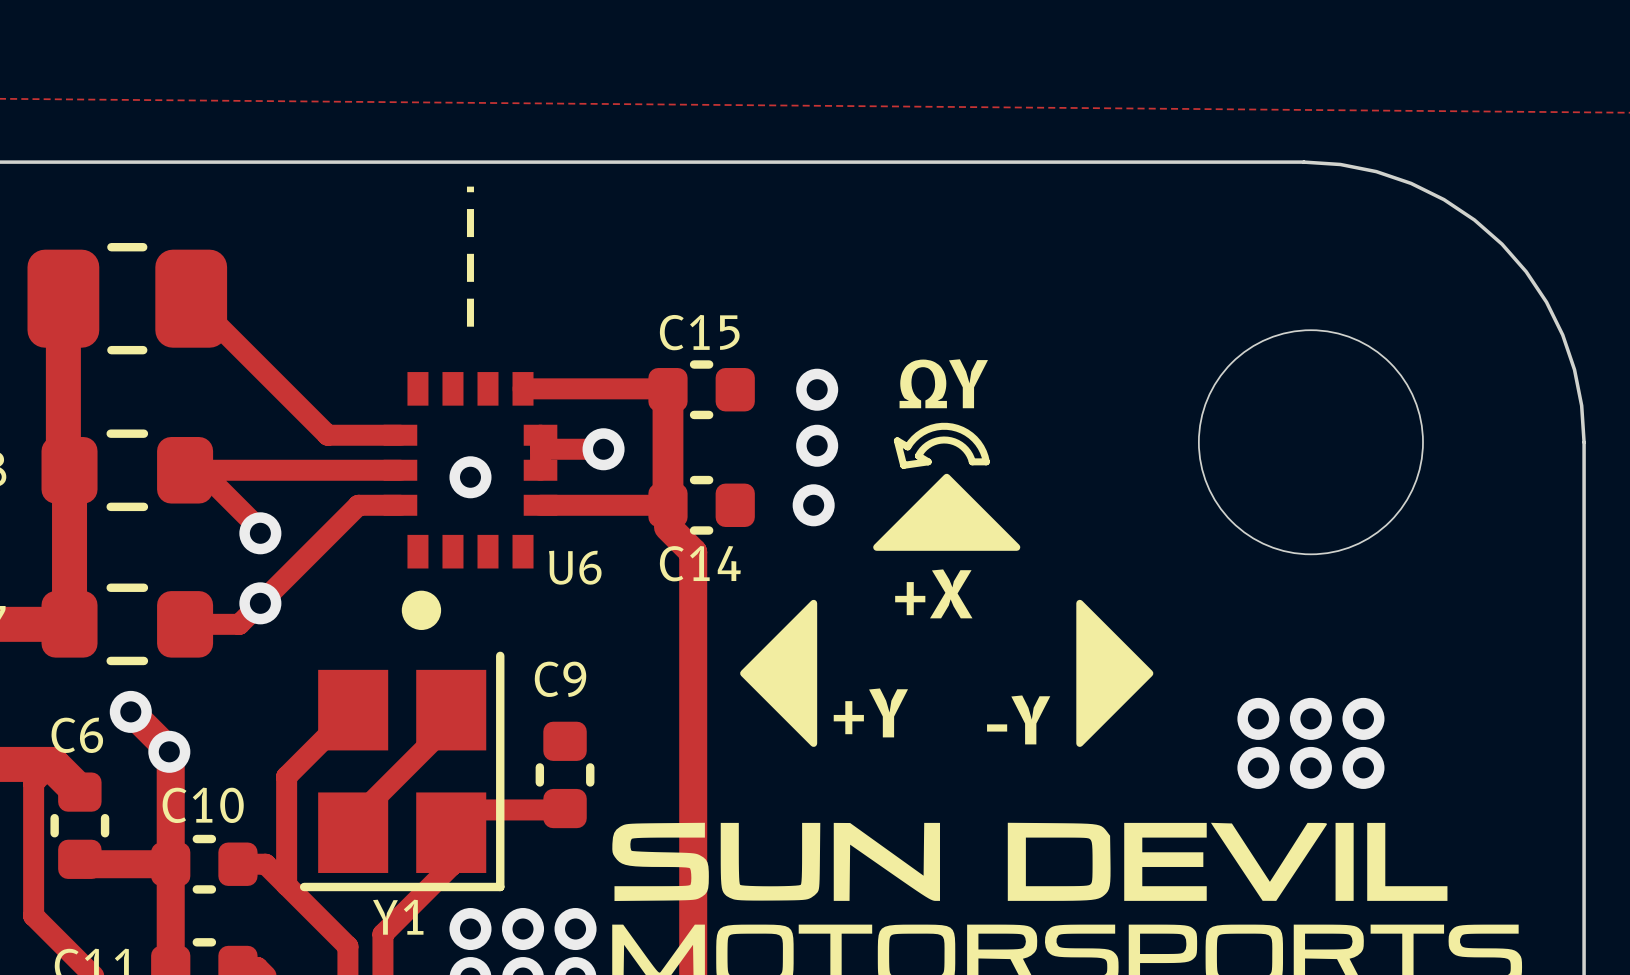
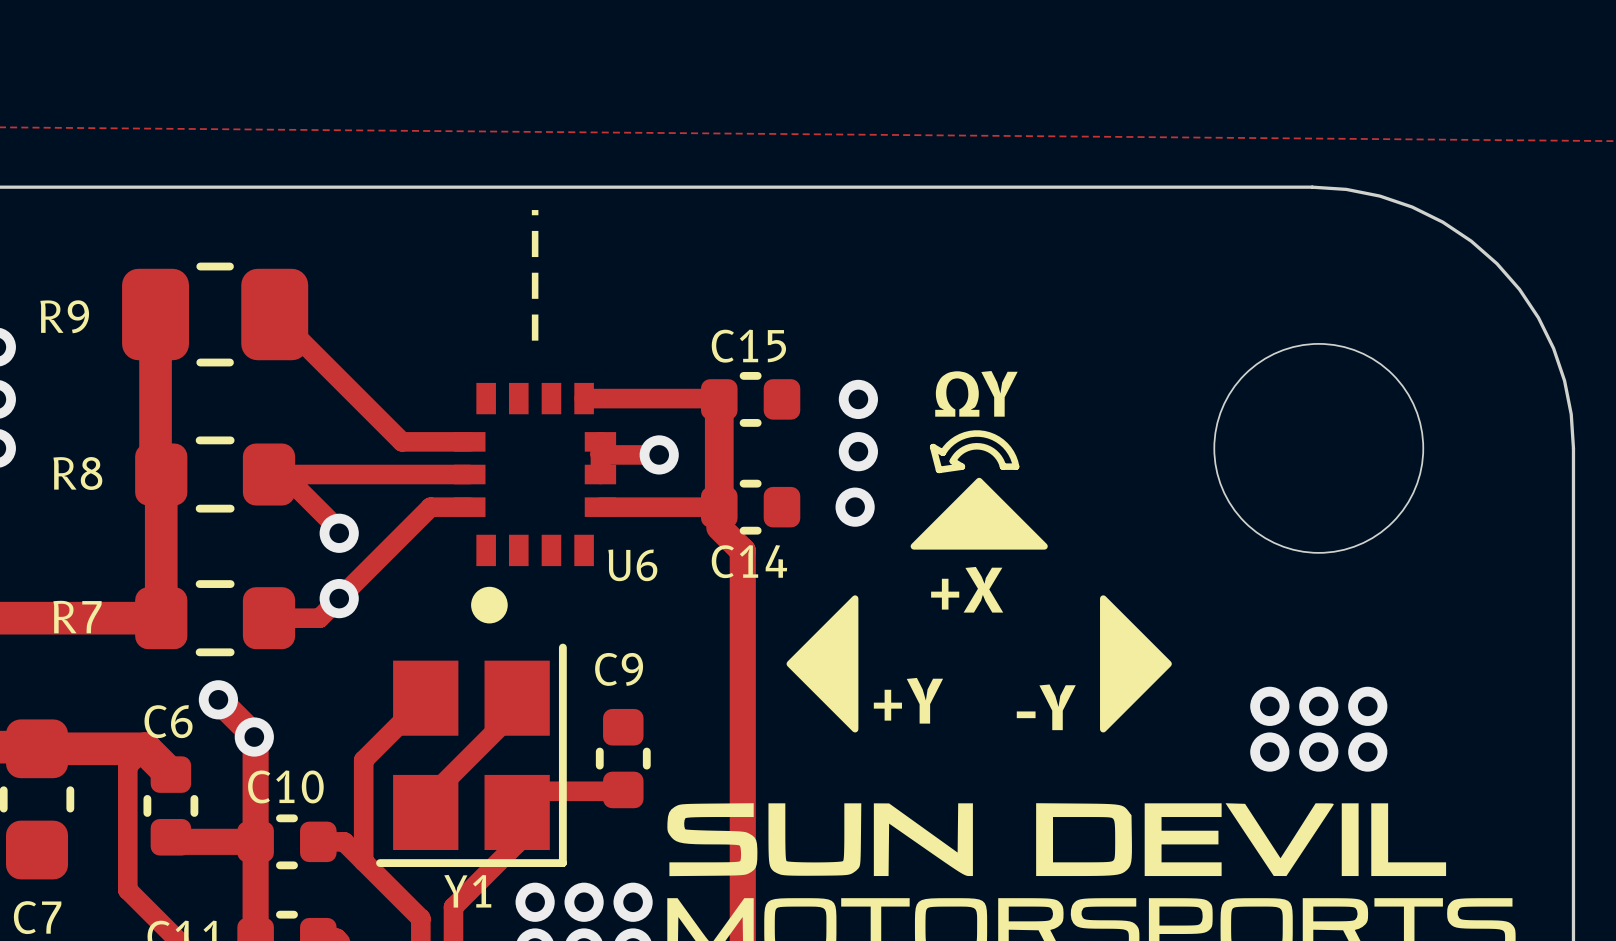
via: (470, 477) -> none

